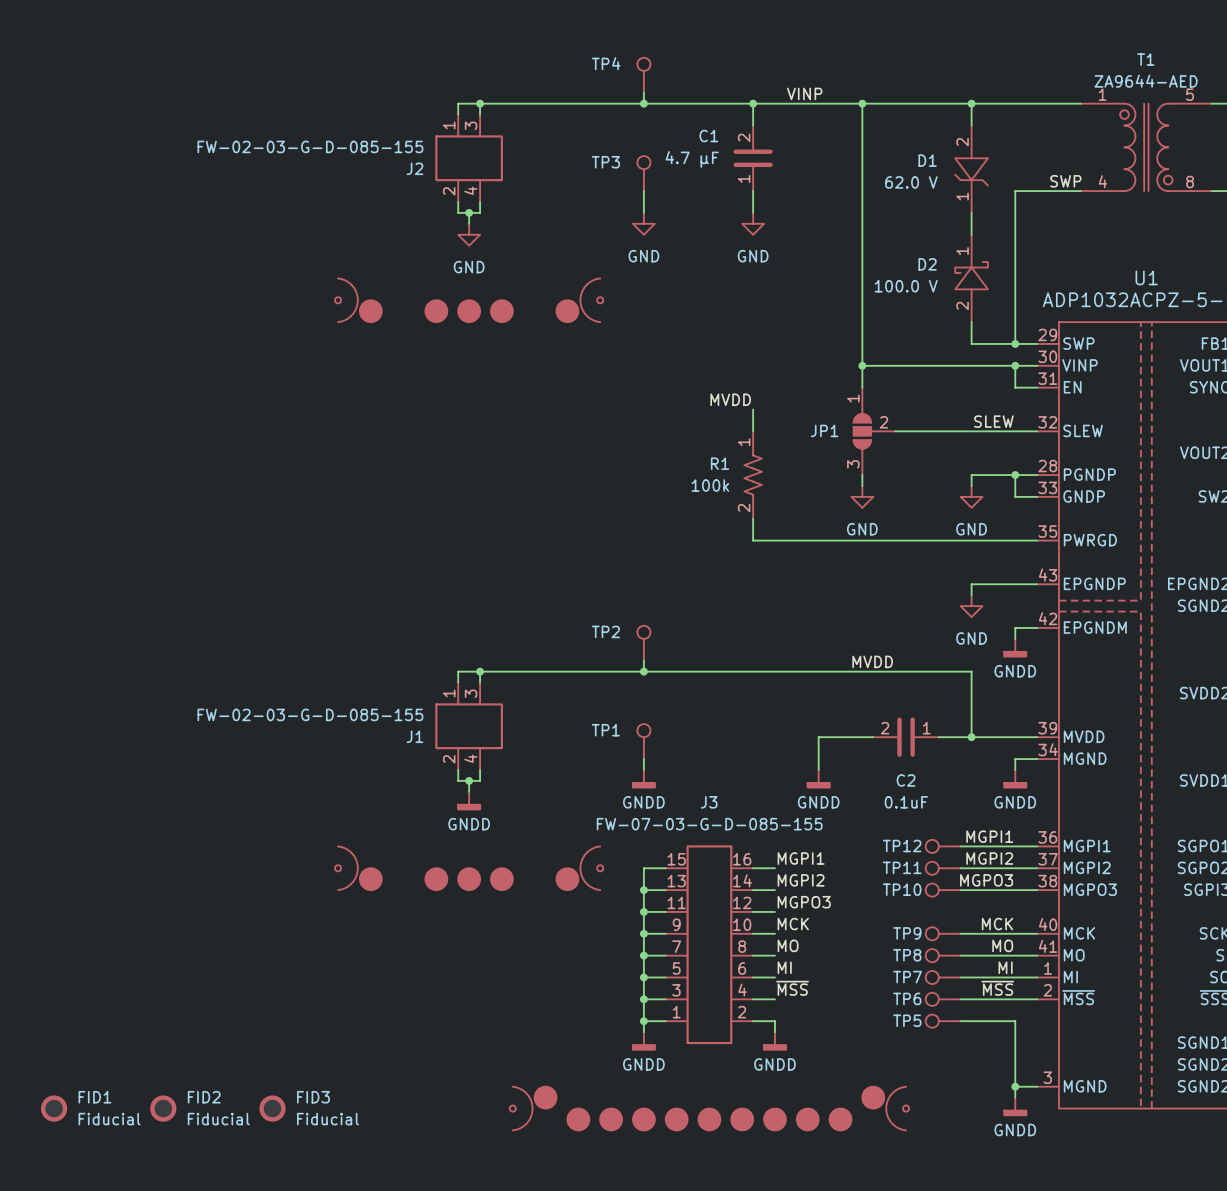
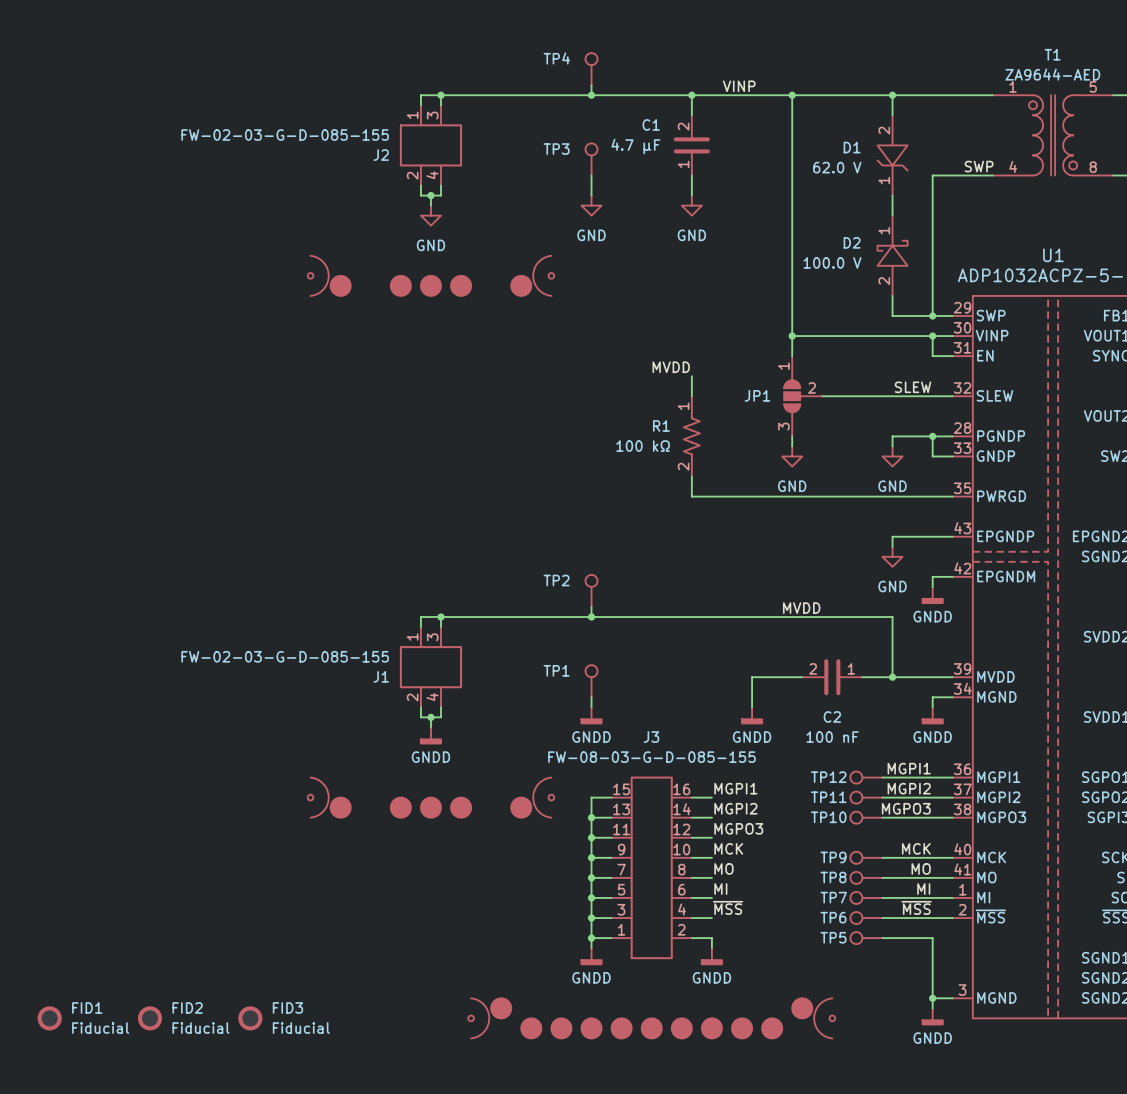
R1 value: 100k (710, 485) -> 100 kΩ (643, 446)
C2 value: 0.1uF (906, 802) -> 100 nF (832, 737)
J3 value: FW-07-03-G-D-085-155 (709, 824) -> FW-08-03-G-D-085-155 (651, 757)

